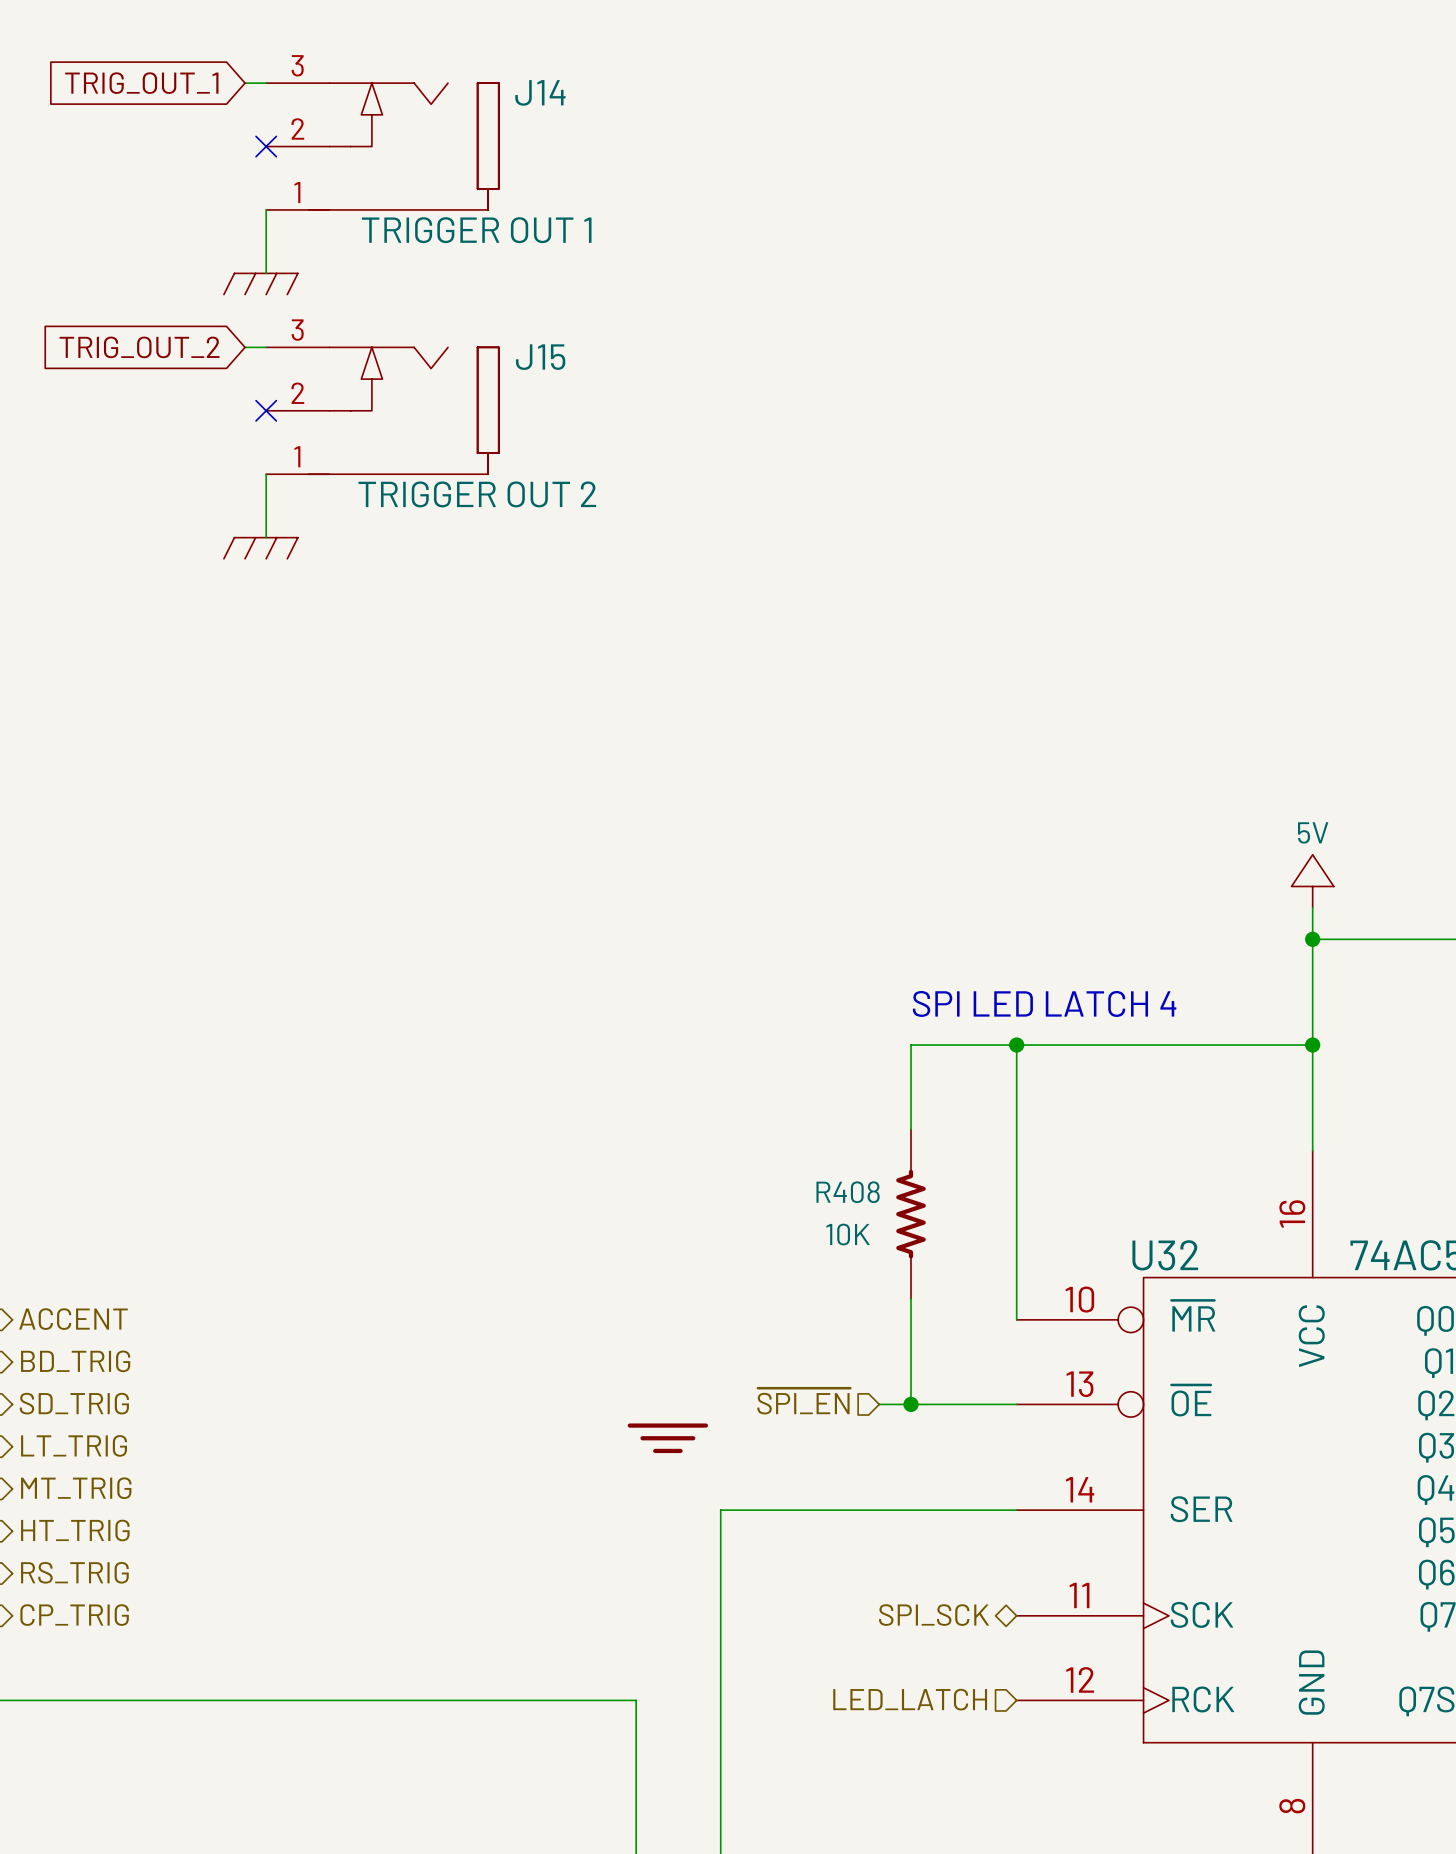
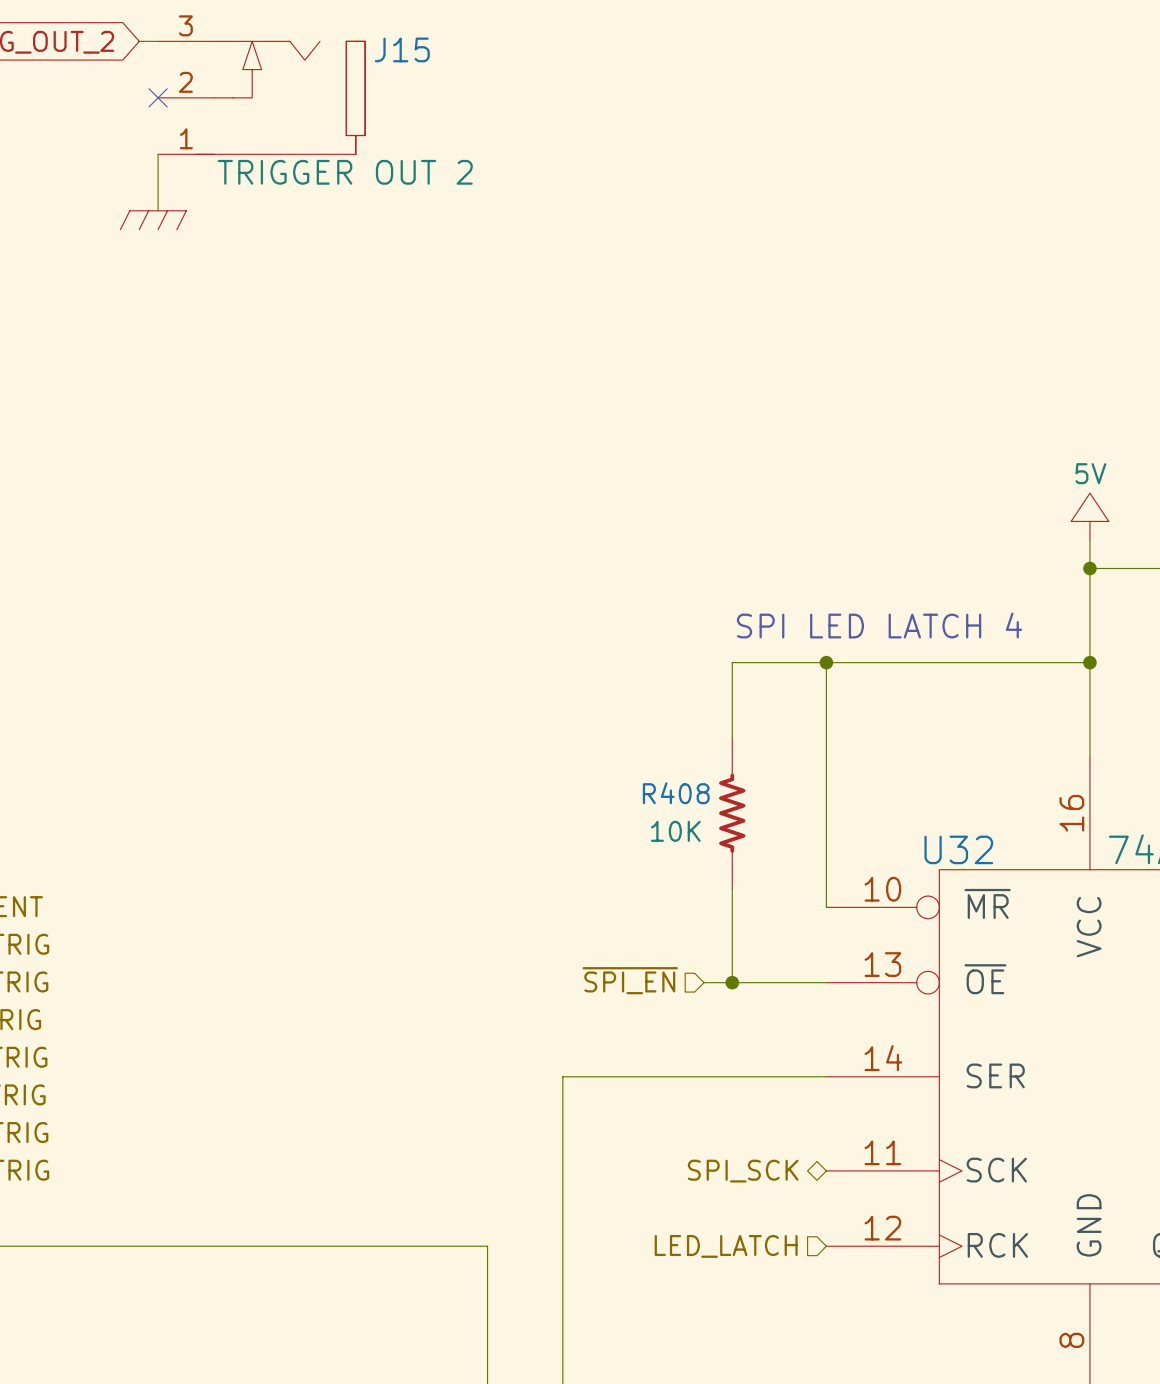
power symbol: (667, 1438) -> none

